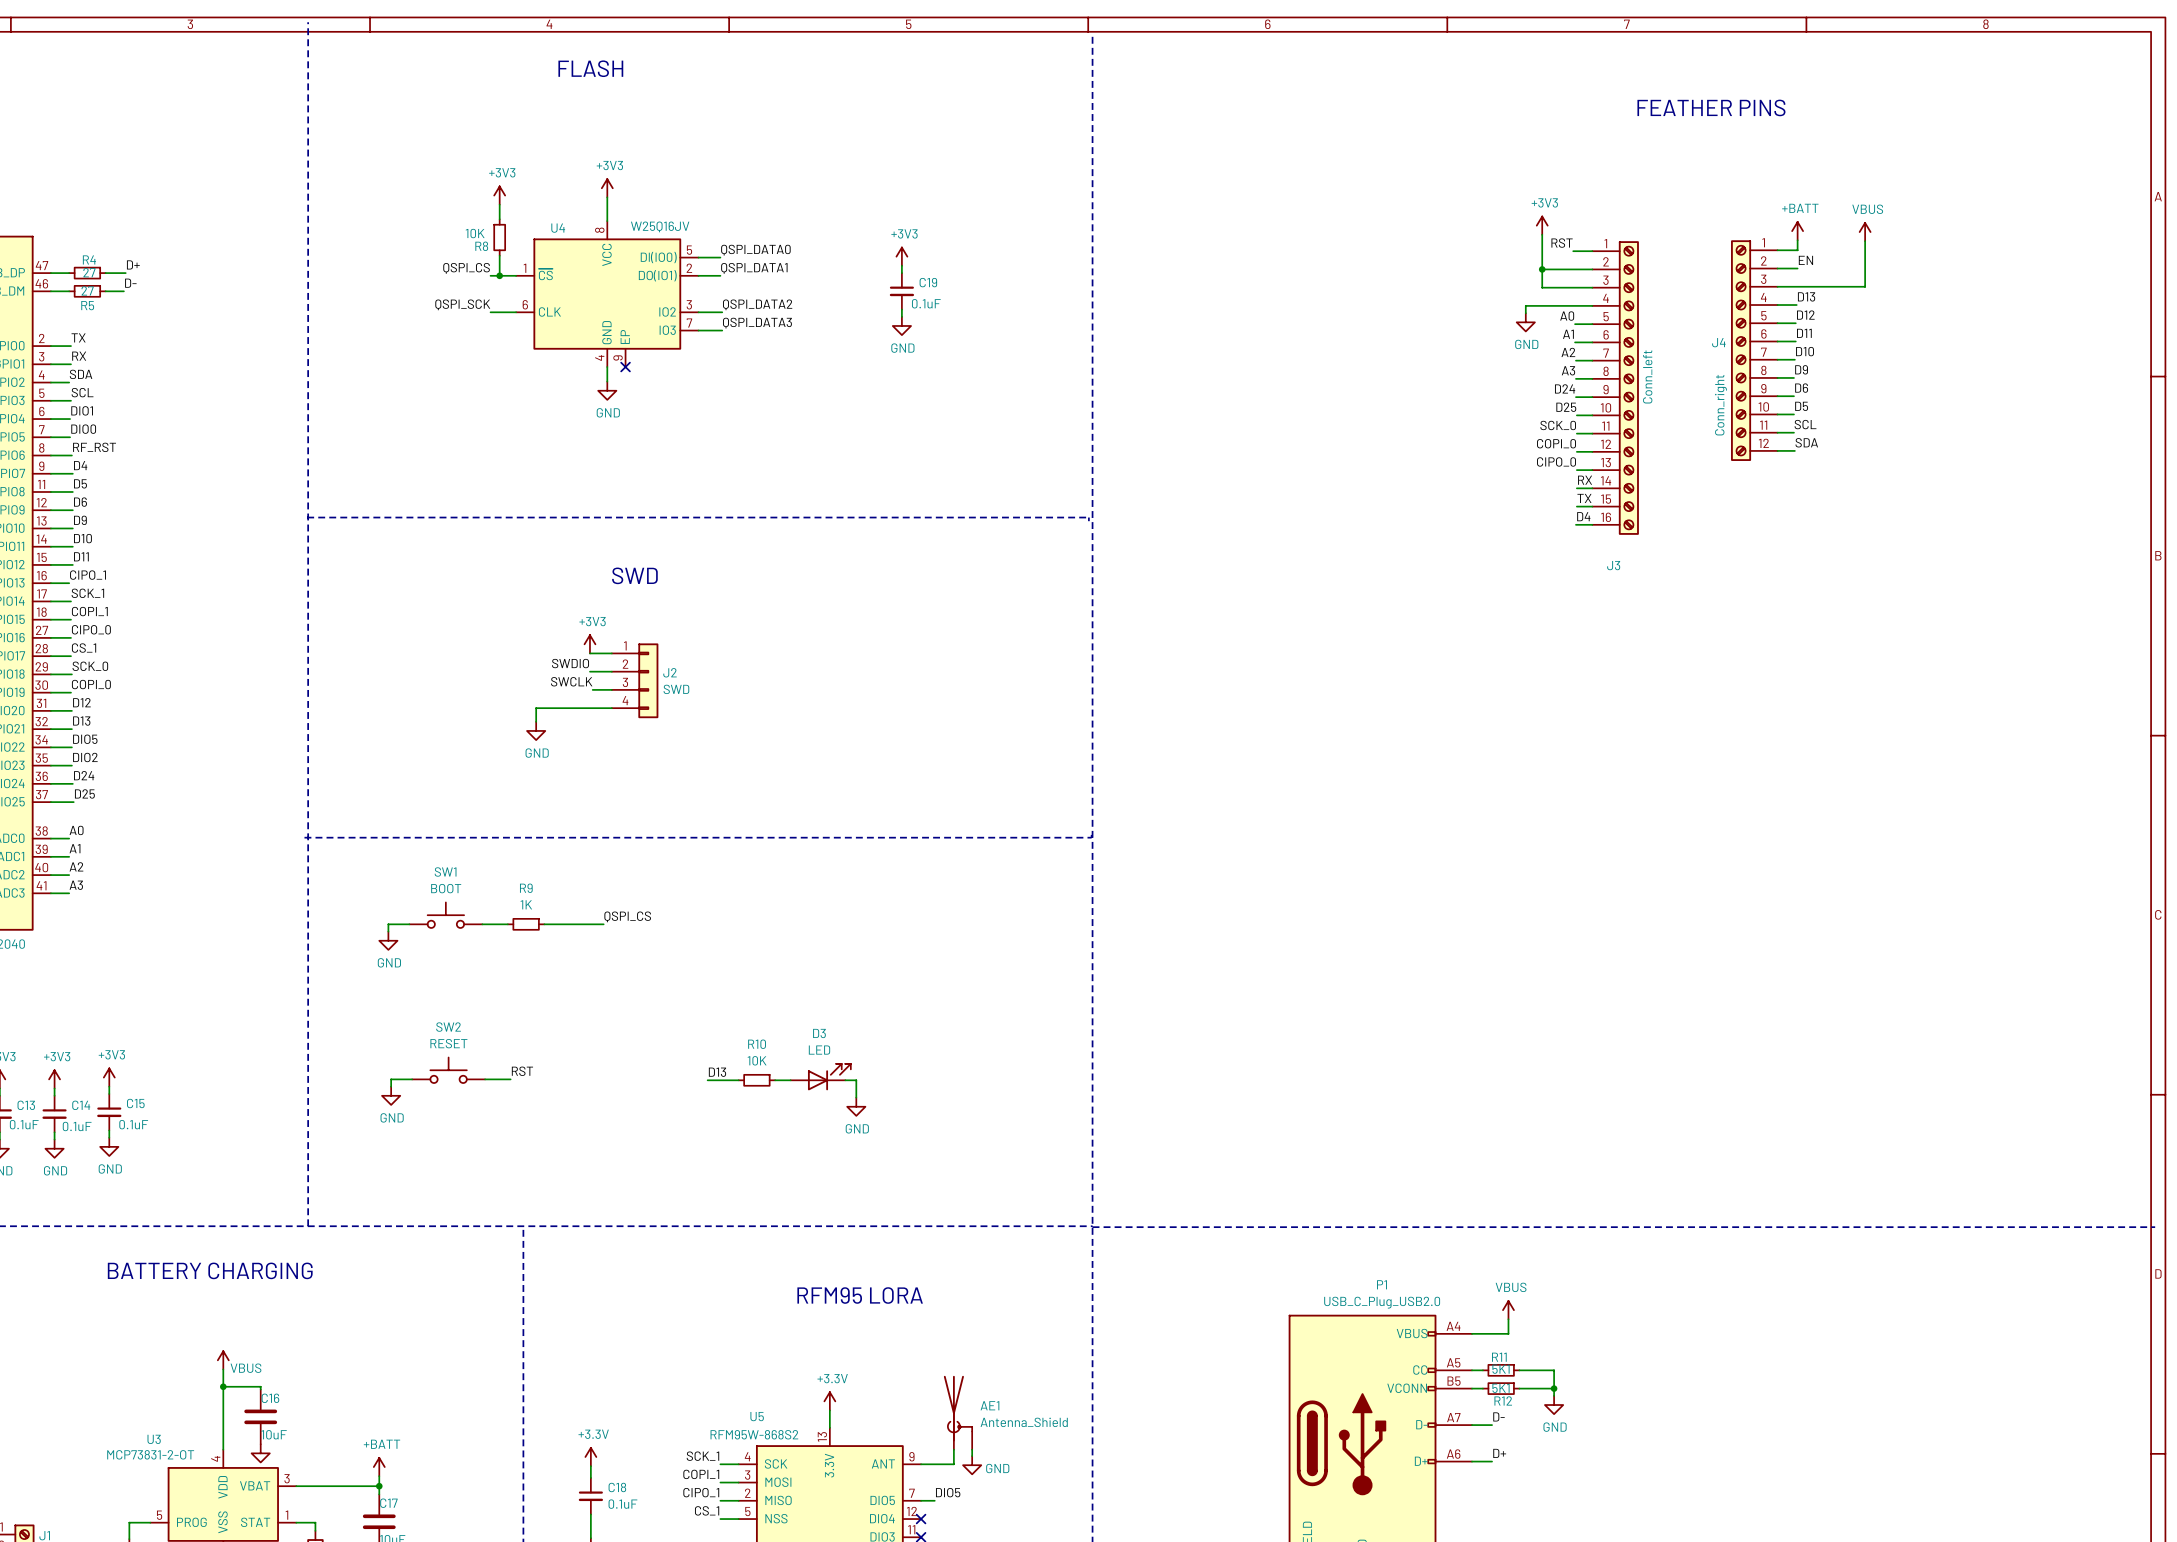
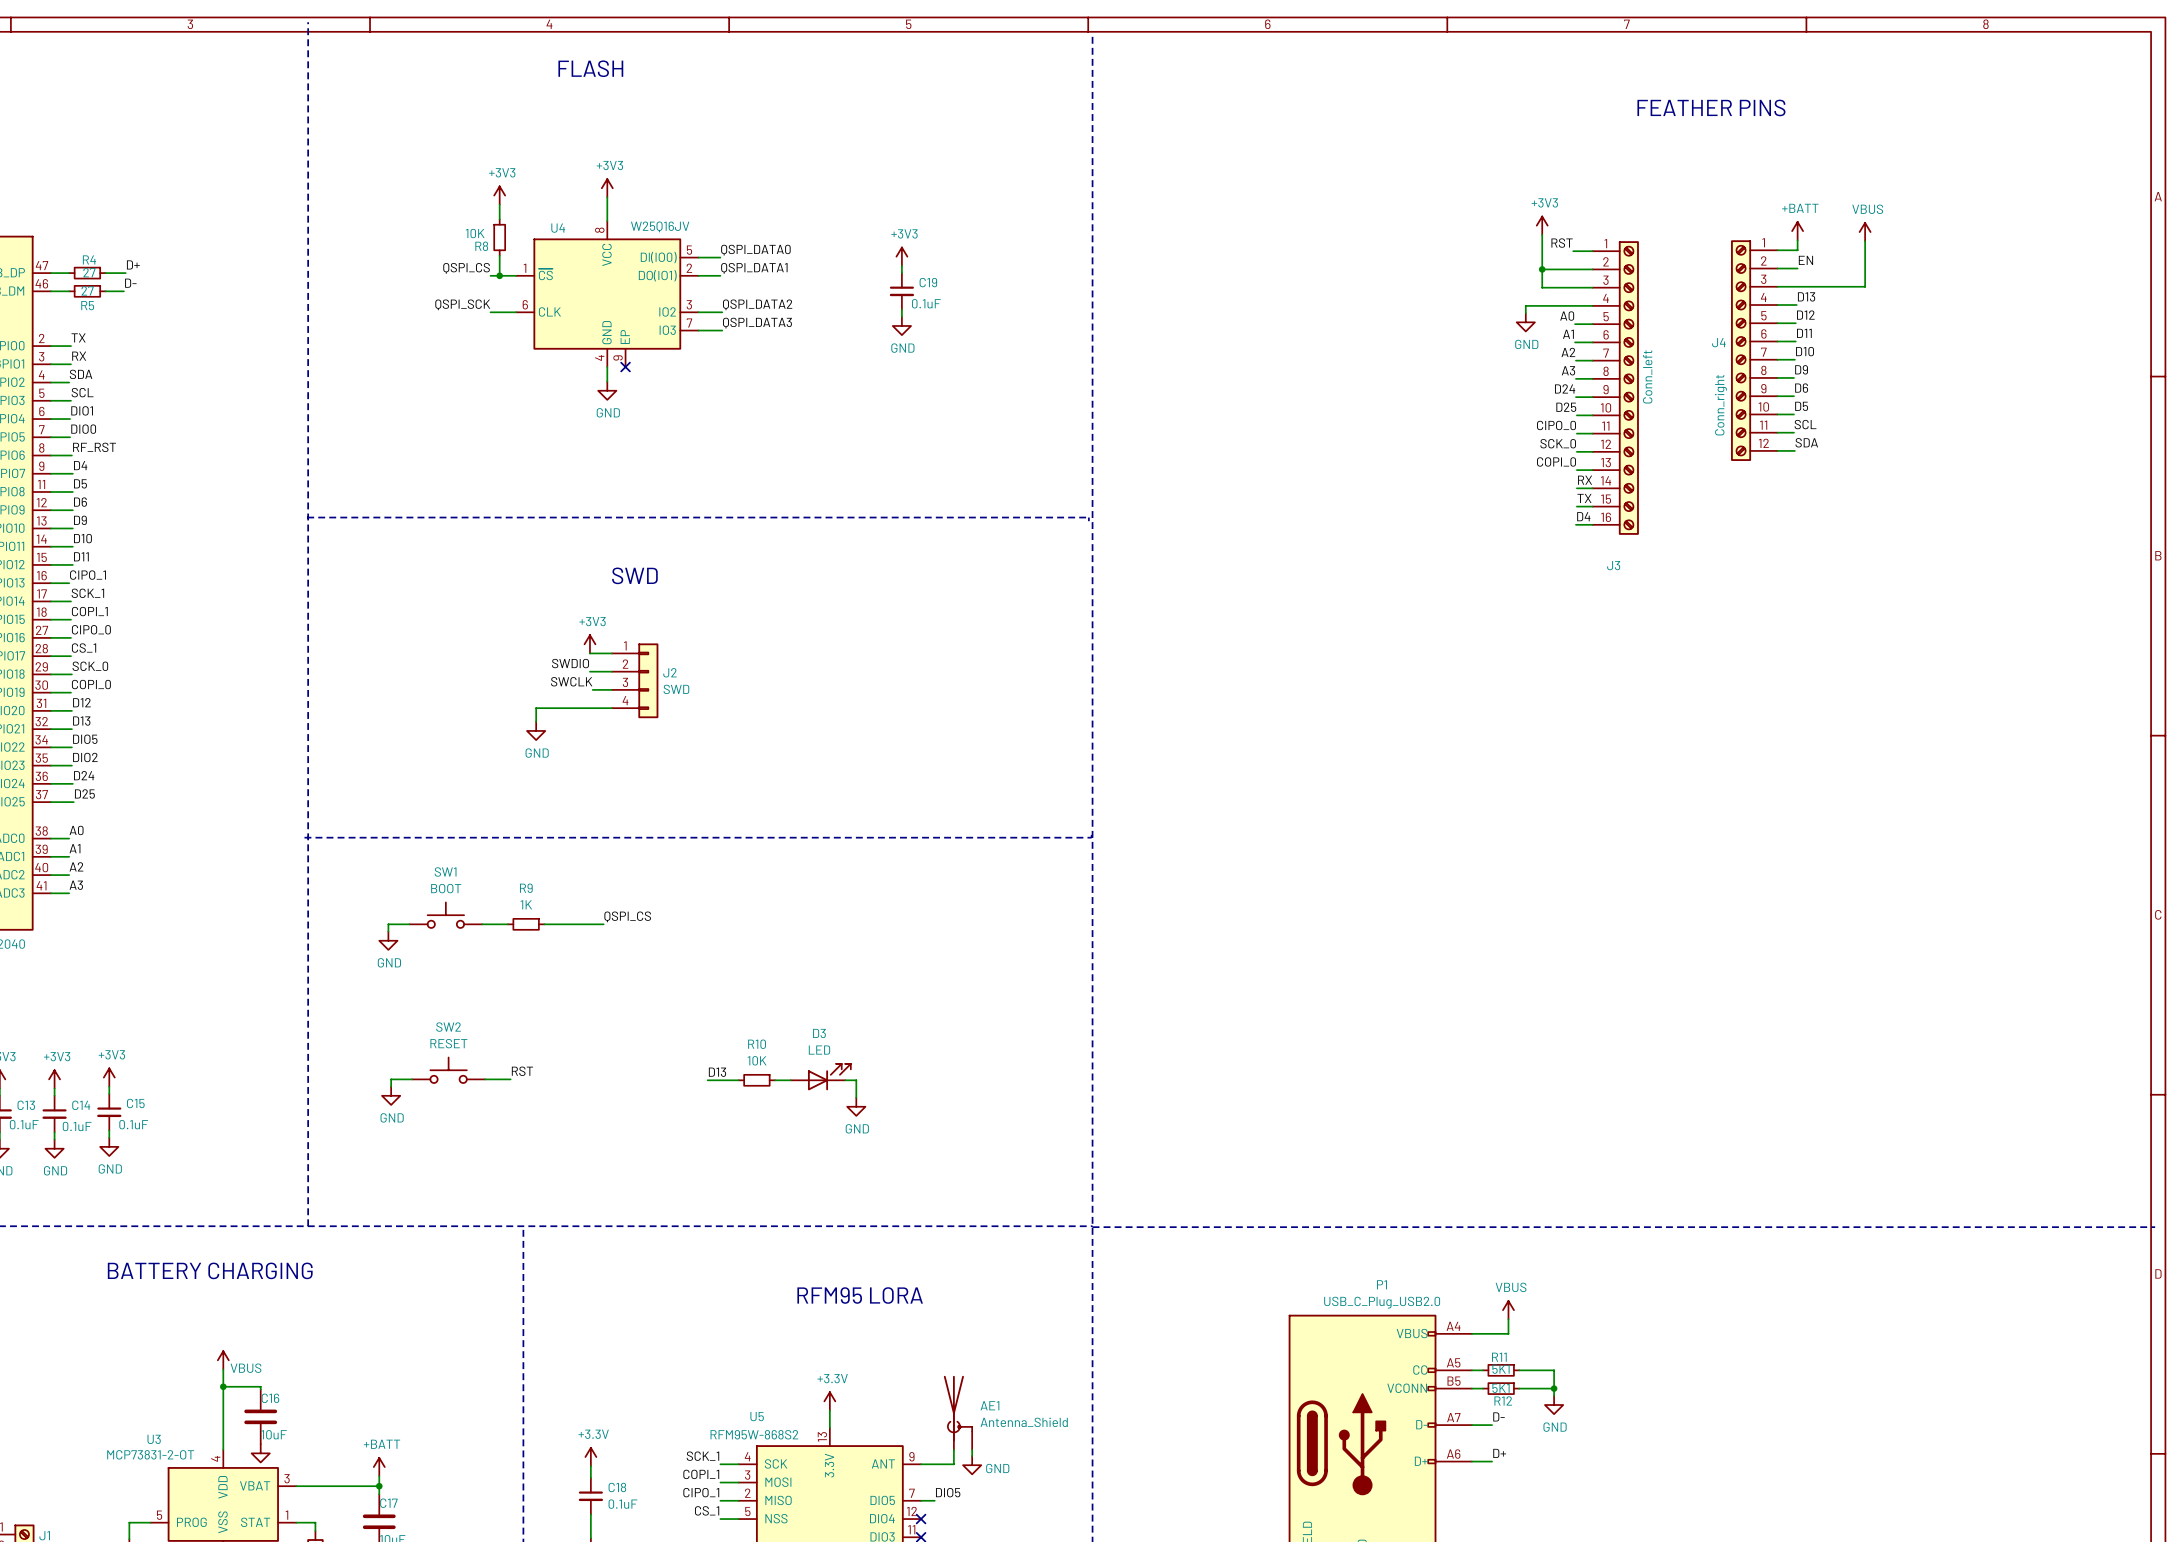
label: SCK_0 (1558, 425) -> CIPO_0 (1556, 425)
label: COPI_0 (1556, 443) -> SCK_0 (1558, 443)
label: CIPO_0 (1556, 461) -> COPI_0 (1556, 461)

